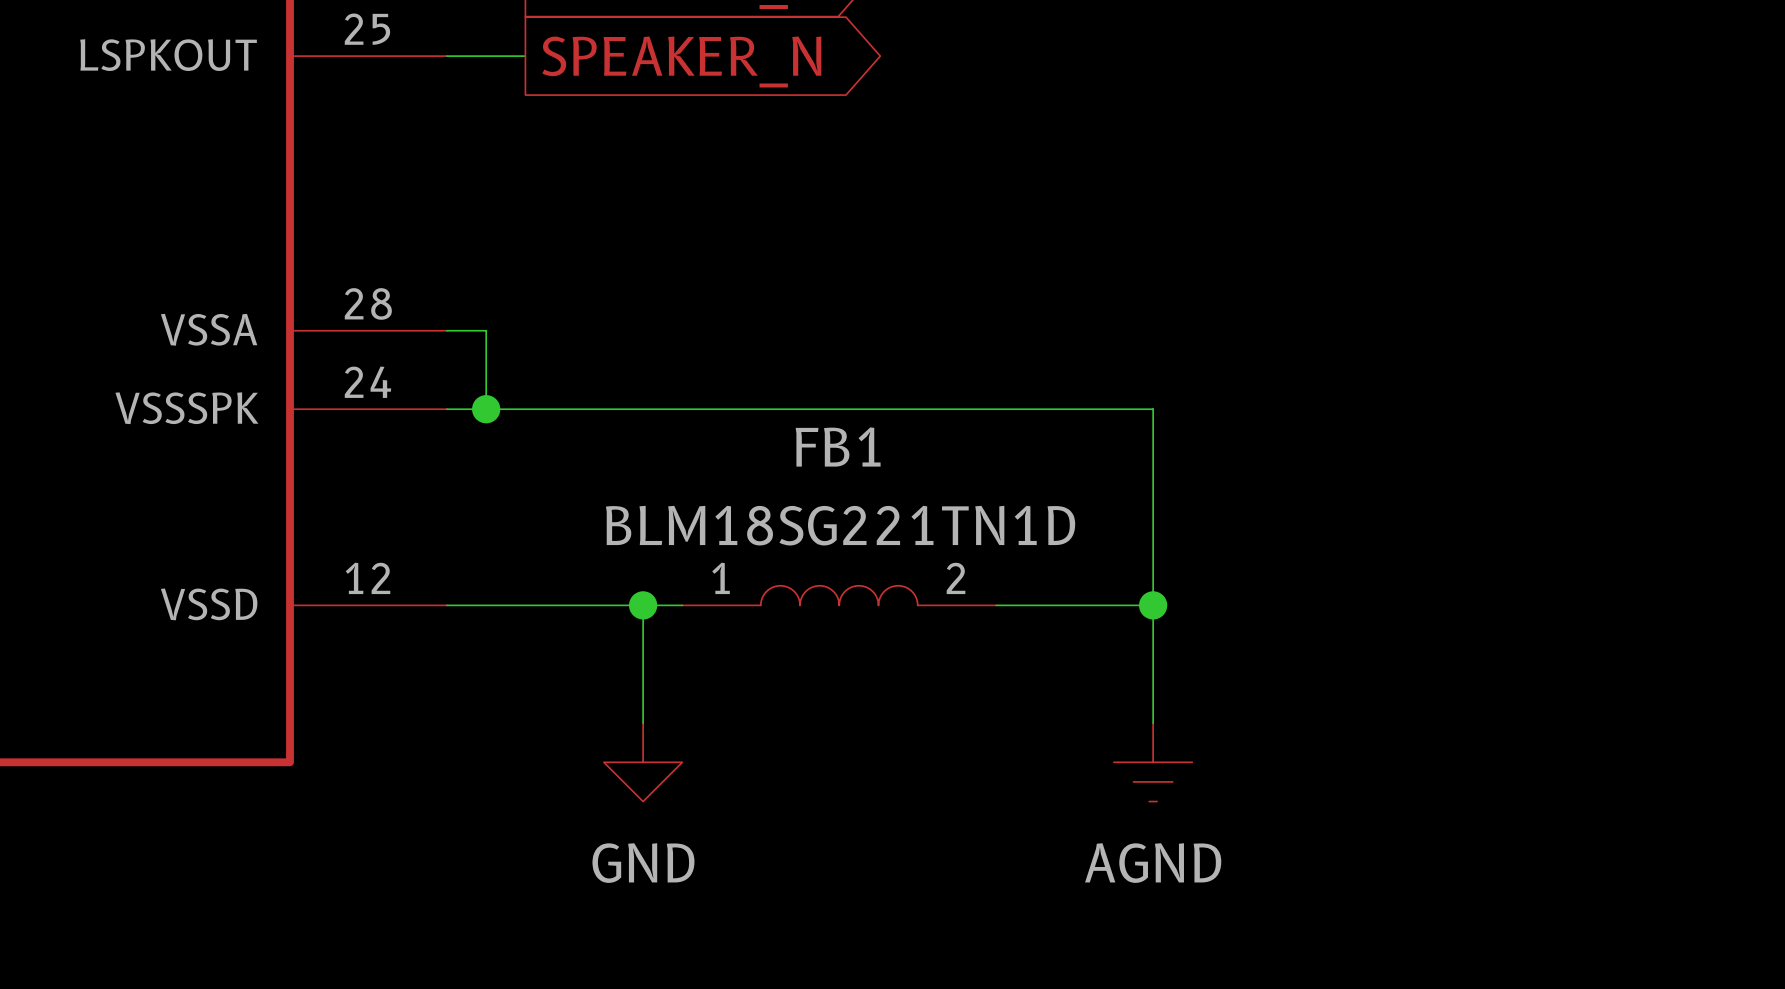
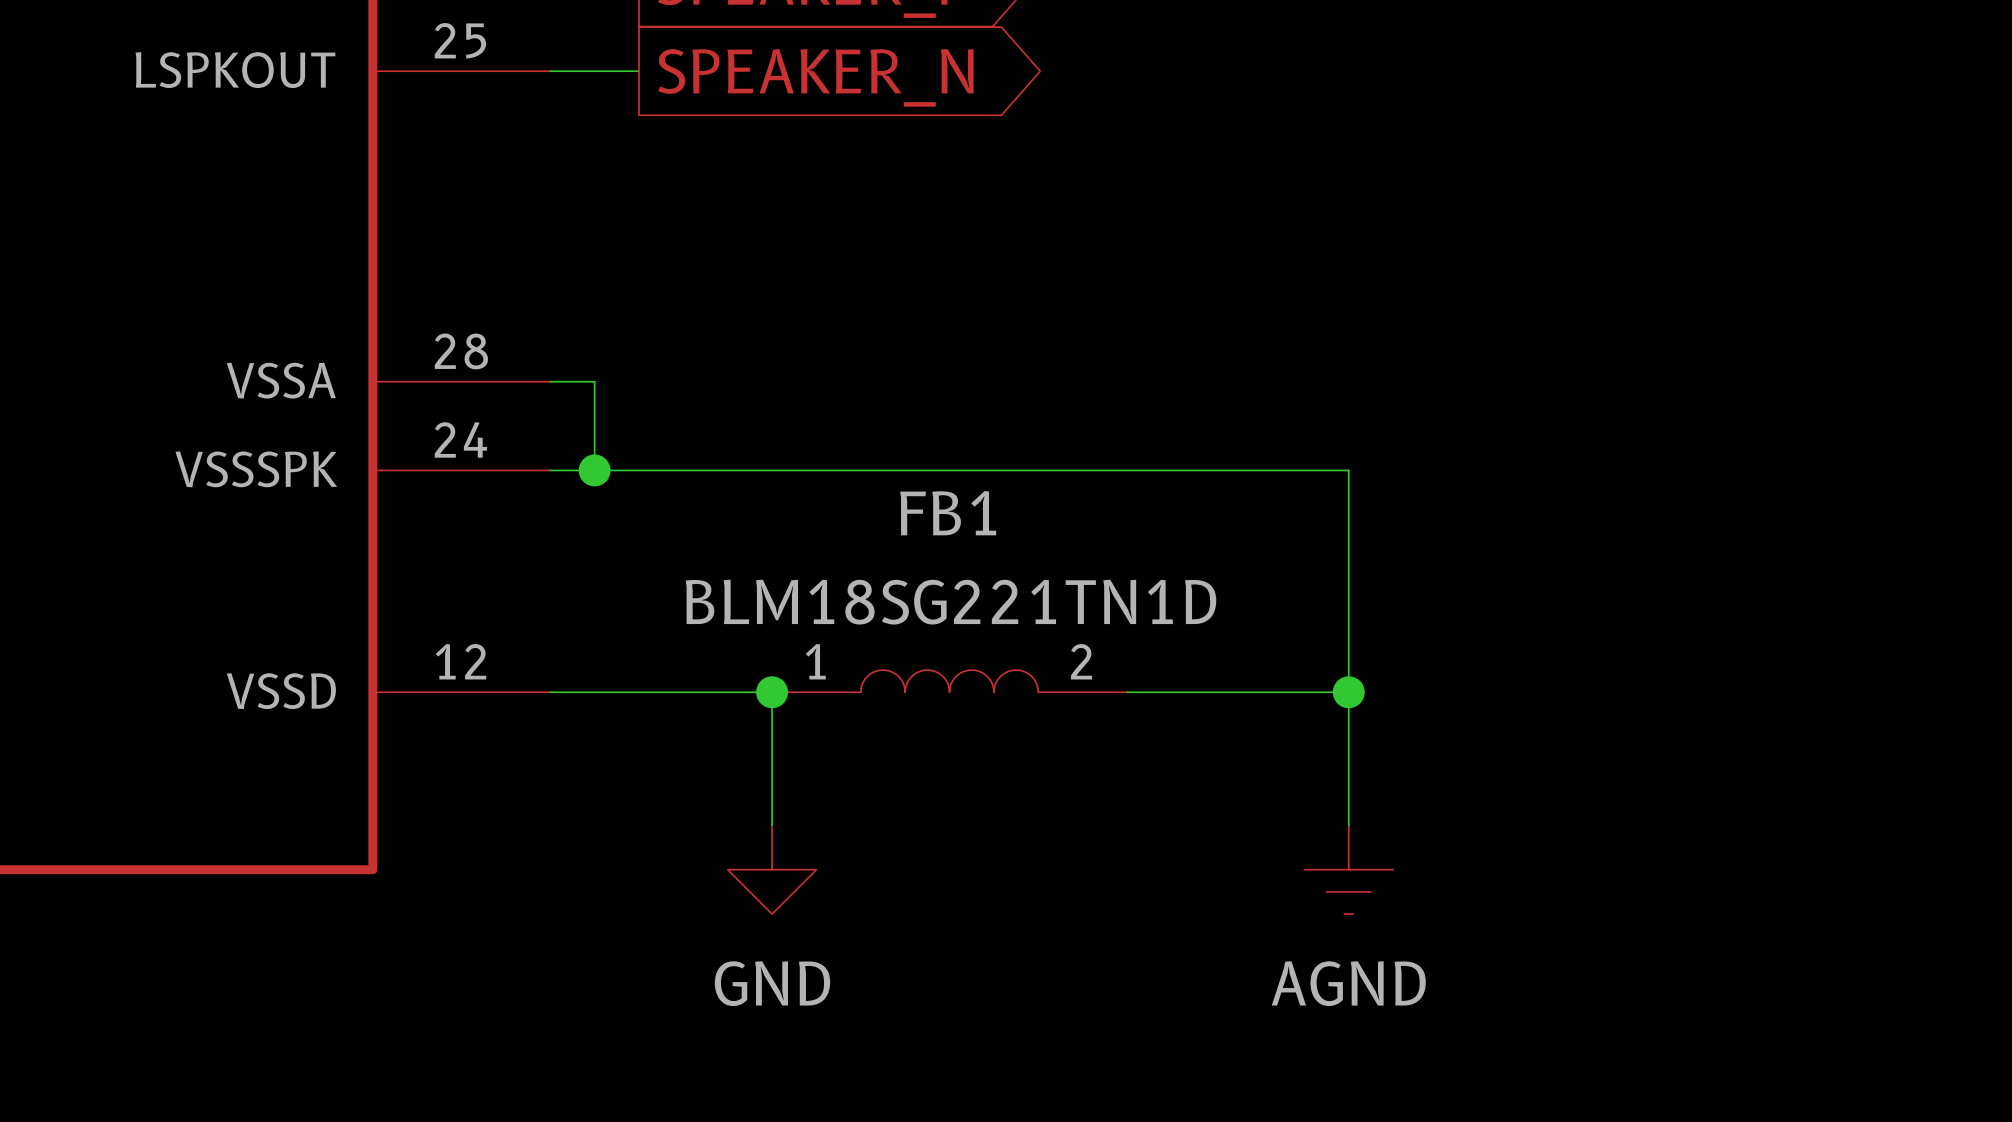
FB1 position: (839, 595) -> (949, 681)

